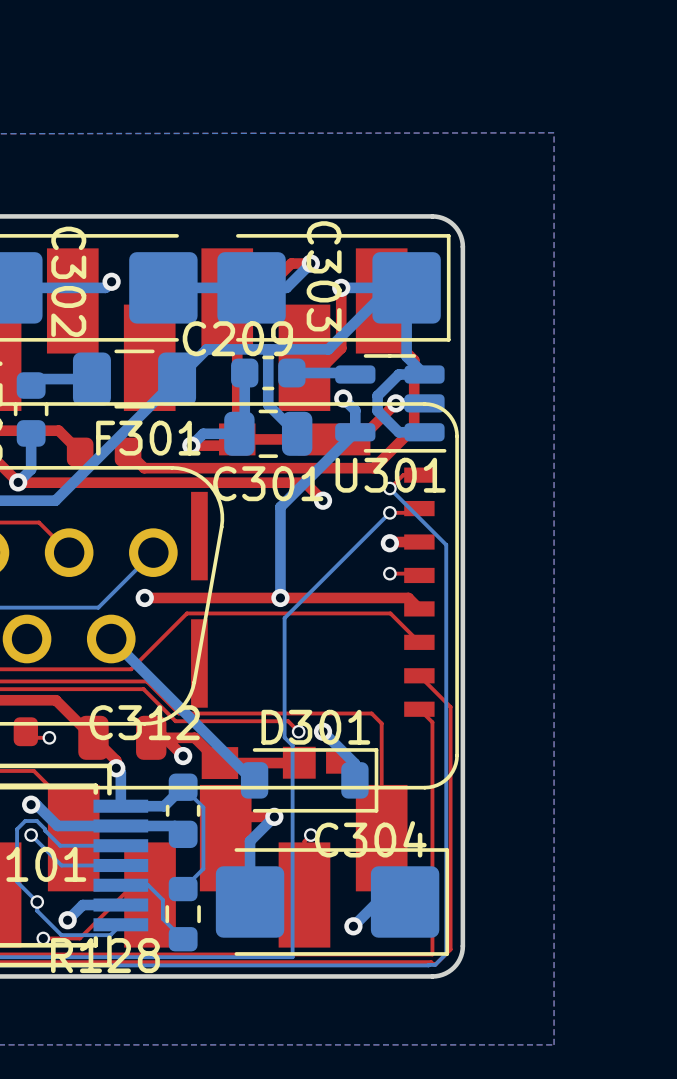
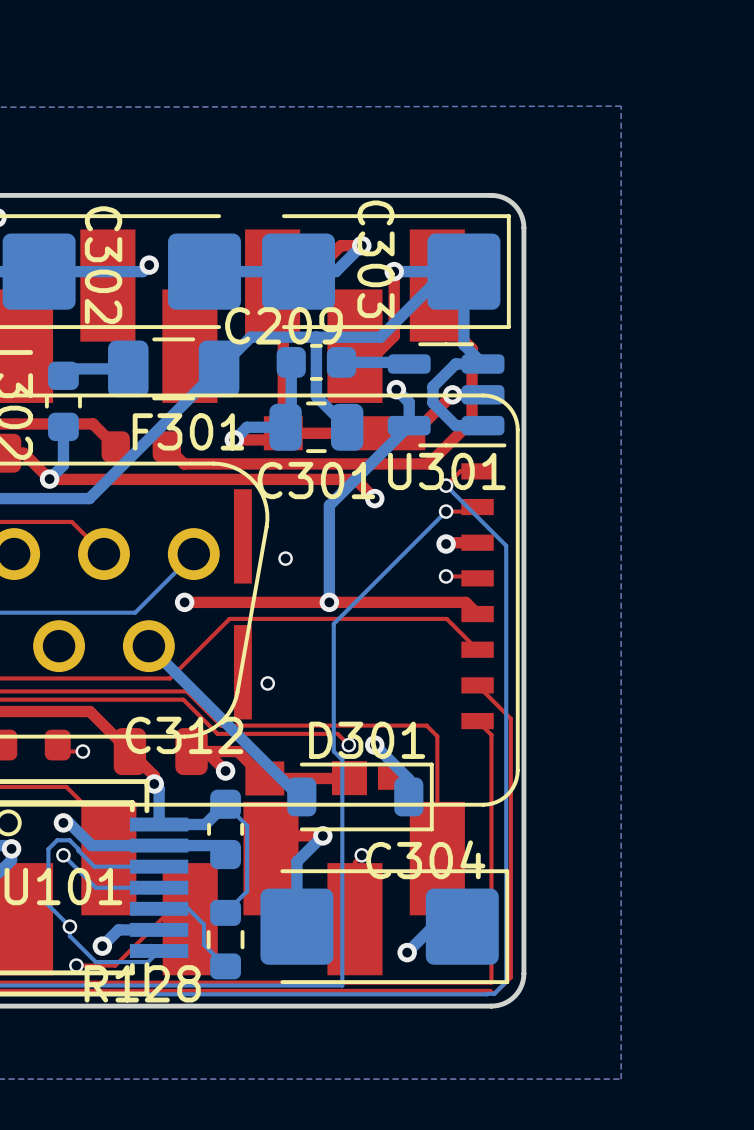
via: none -> (285, 558)
via: none -> (267, 683)

